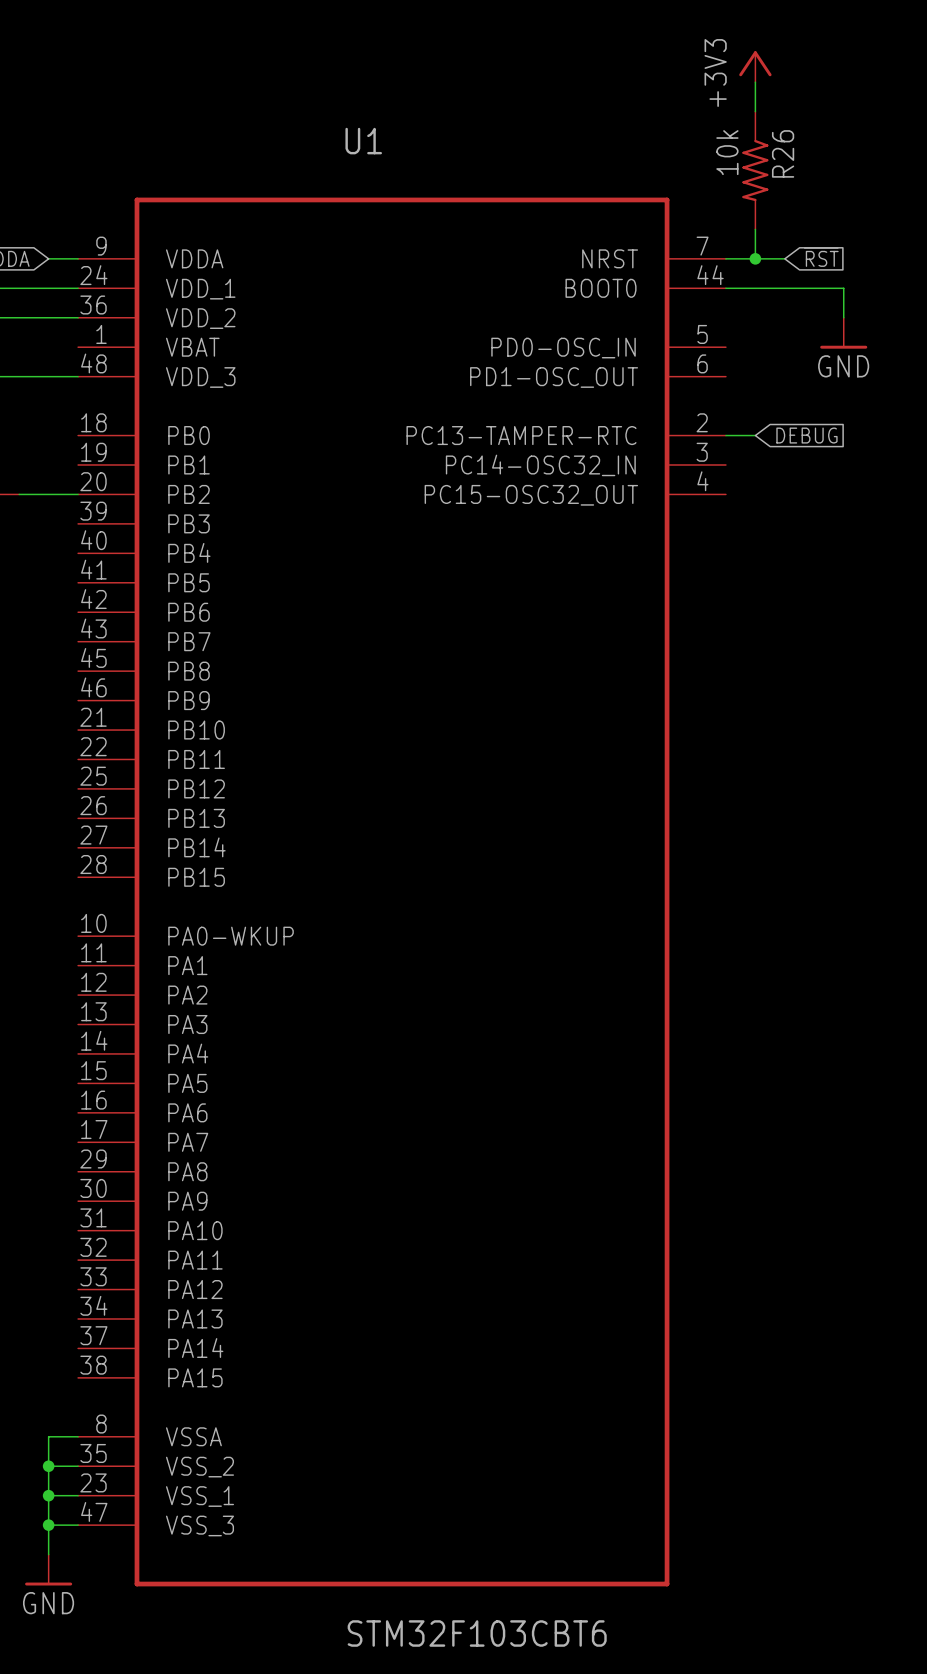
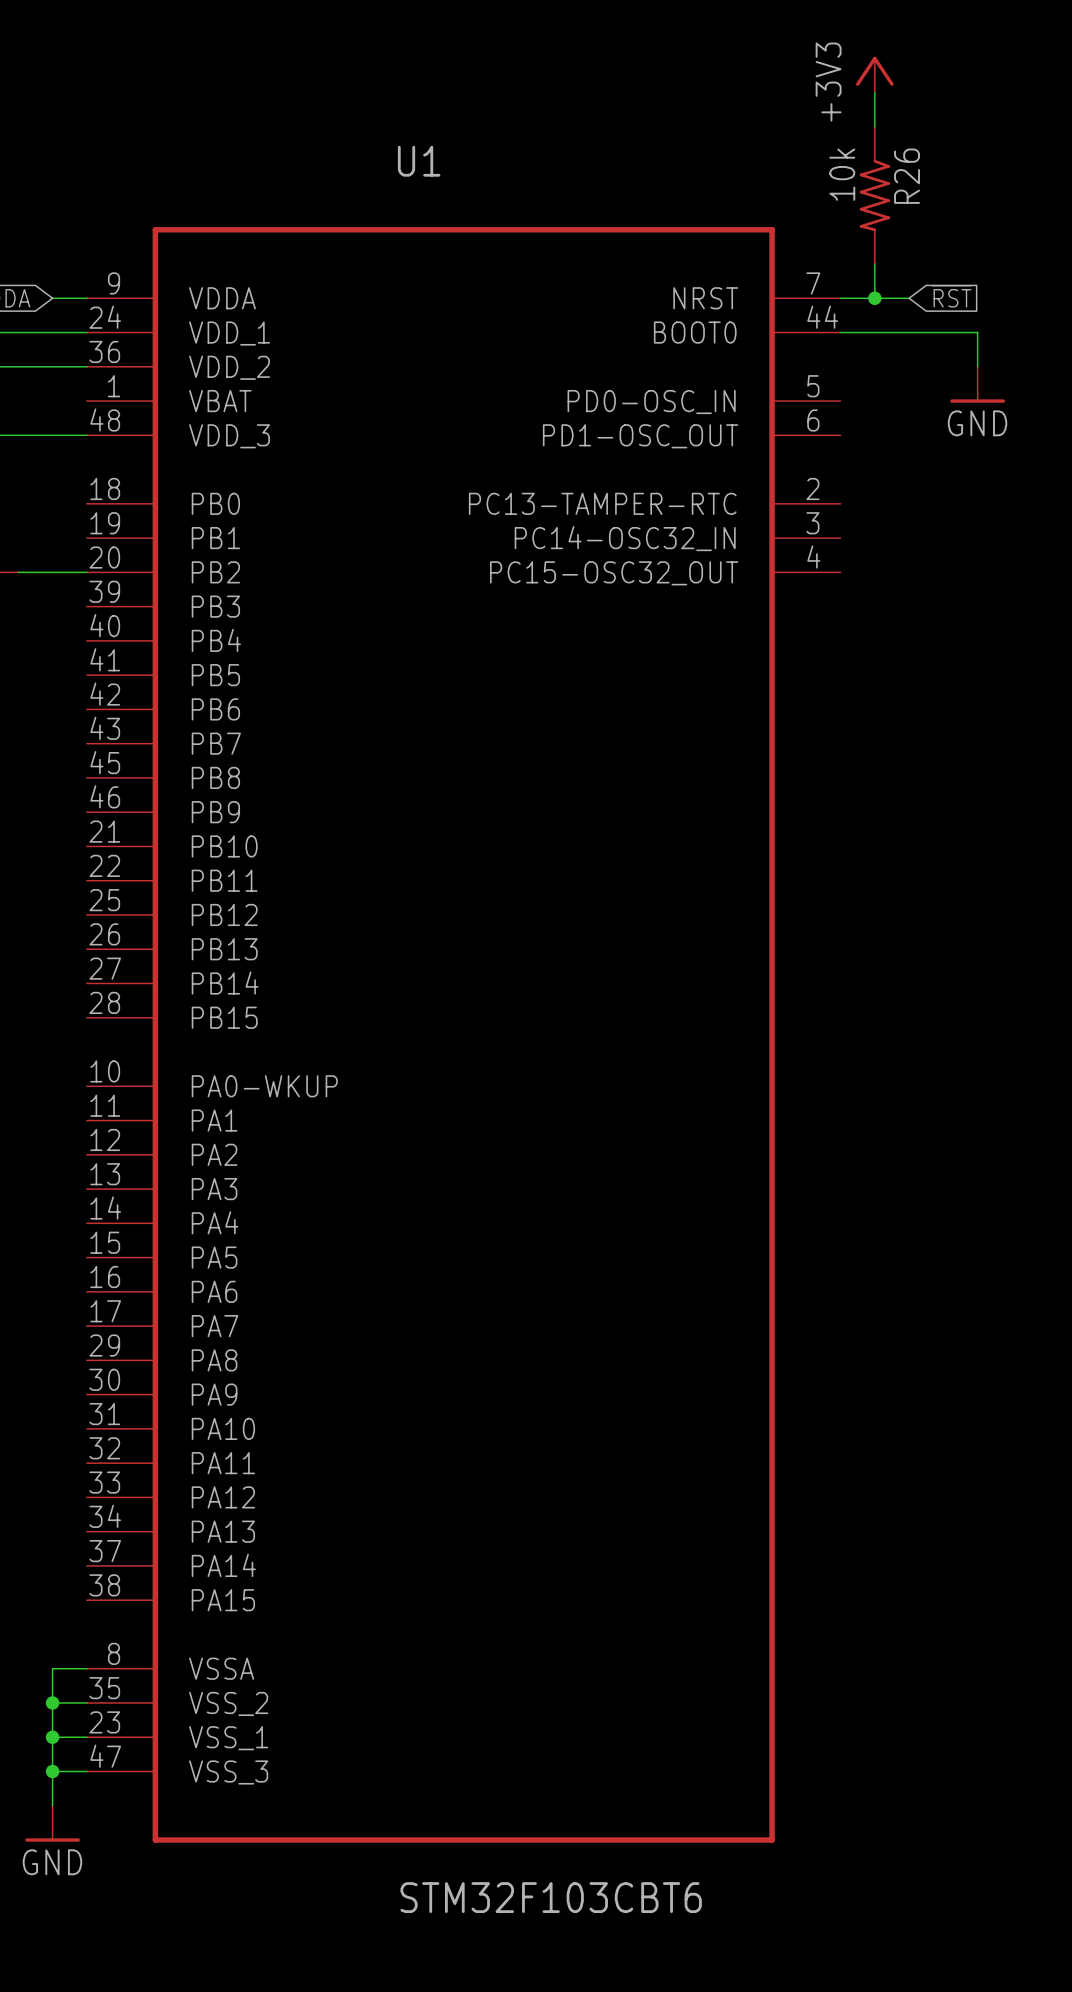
wire: (725, 435) (755, 435) -> none
global label: DEBUG (806, 435) -> none

